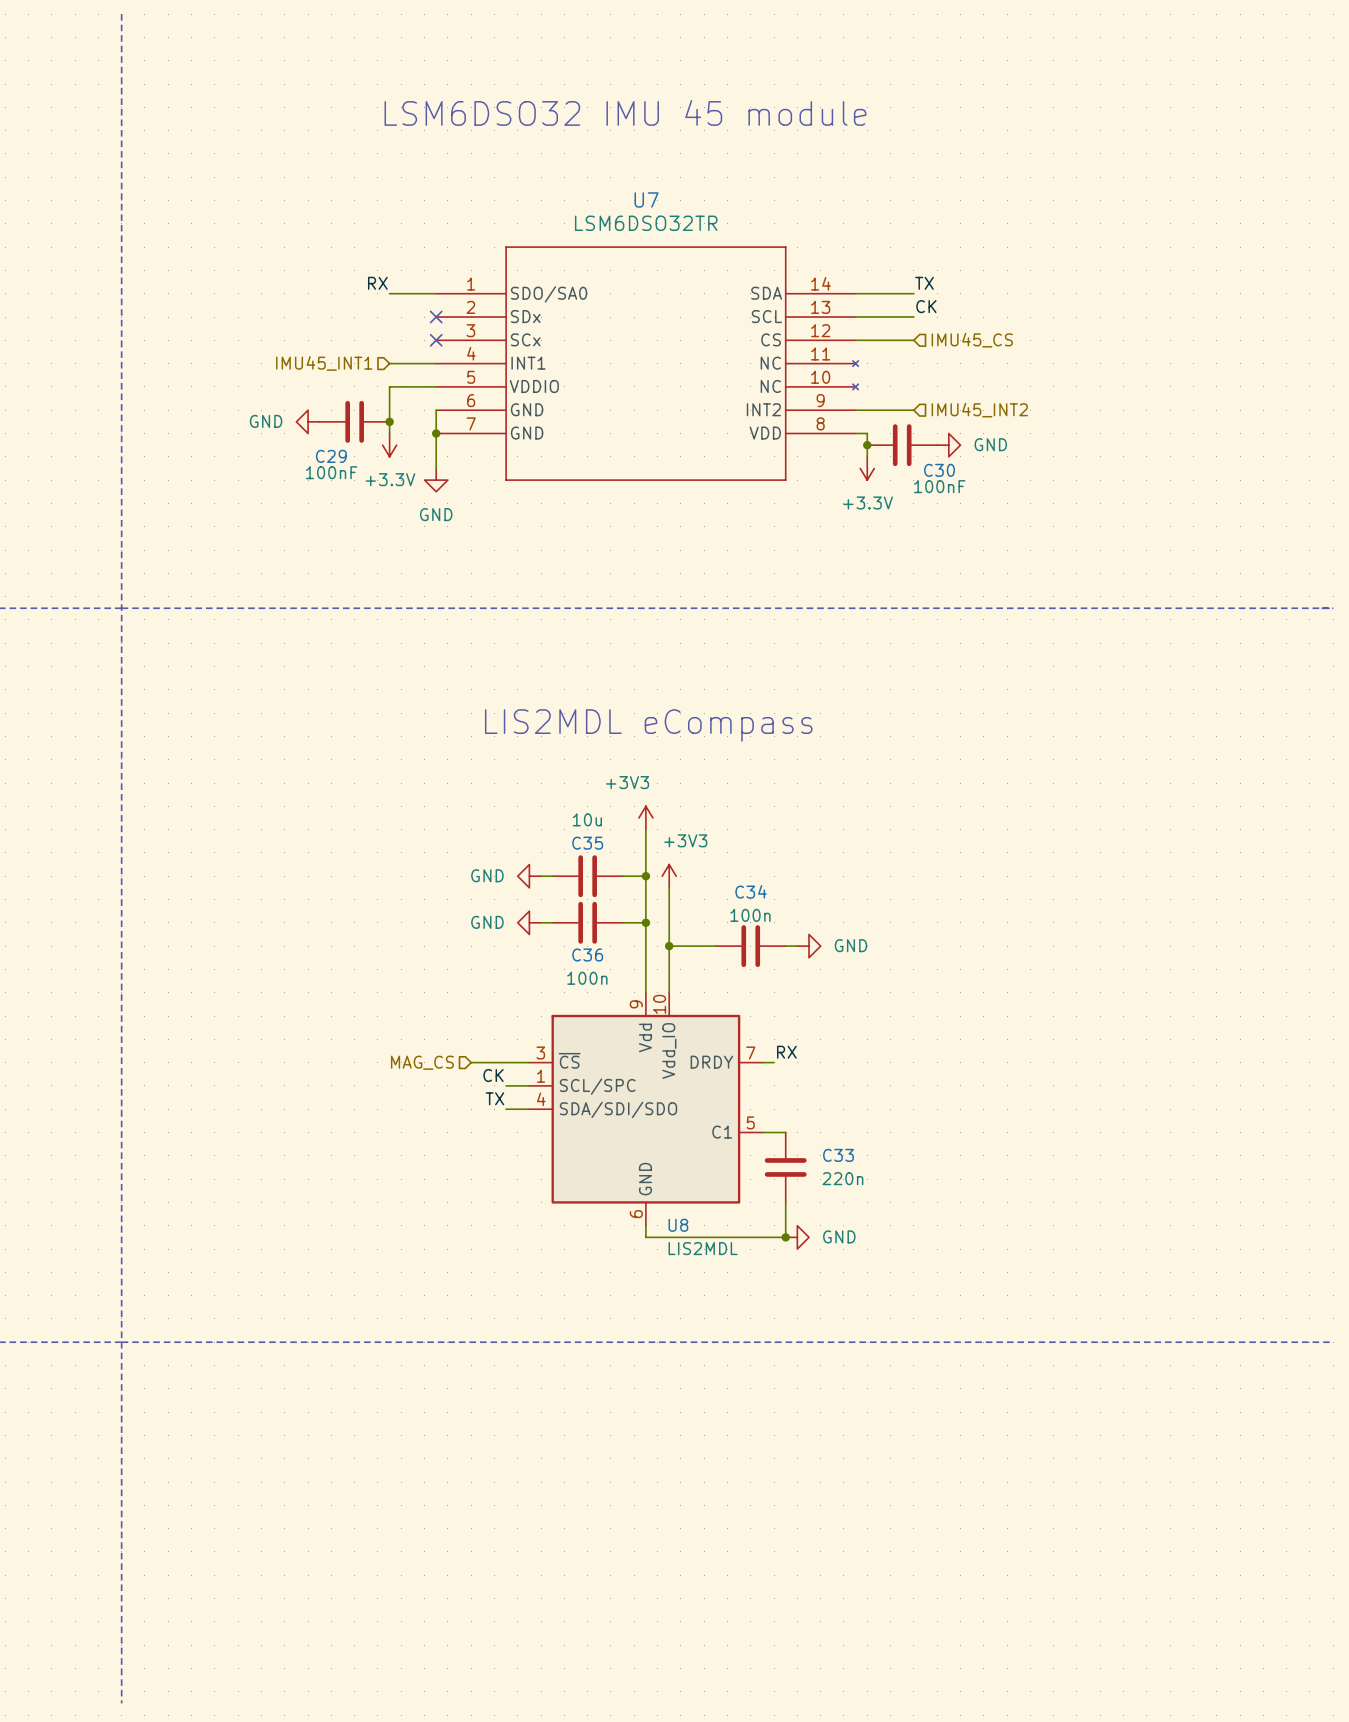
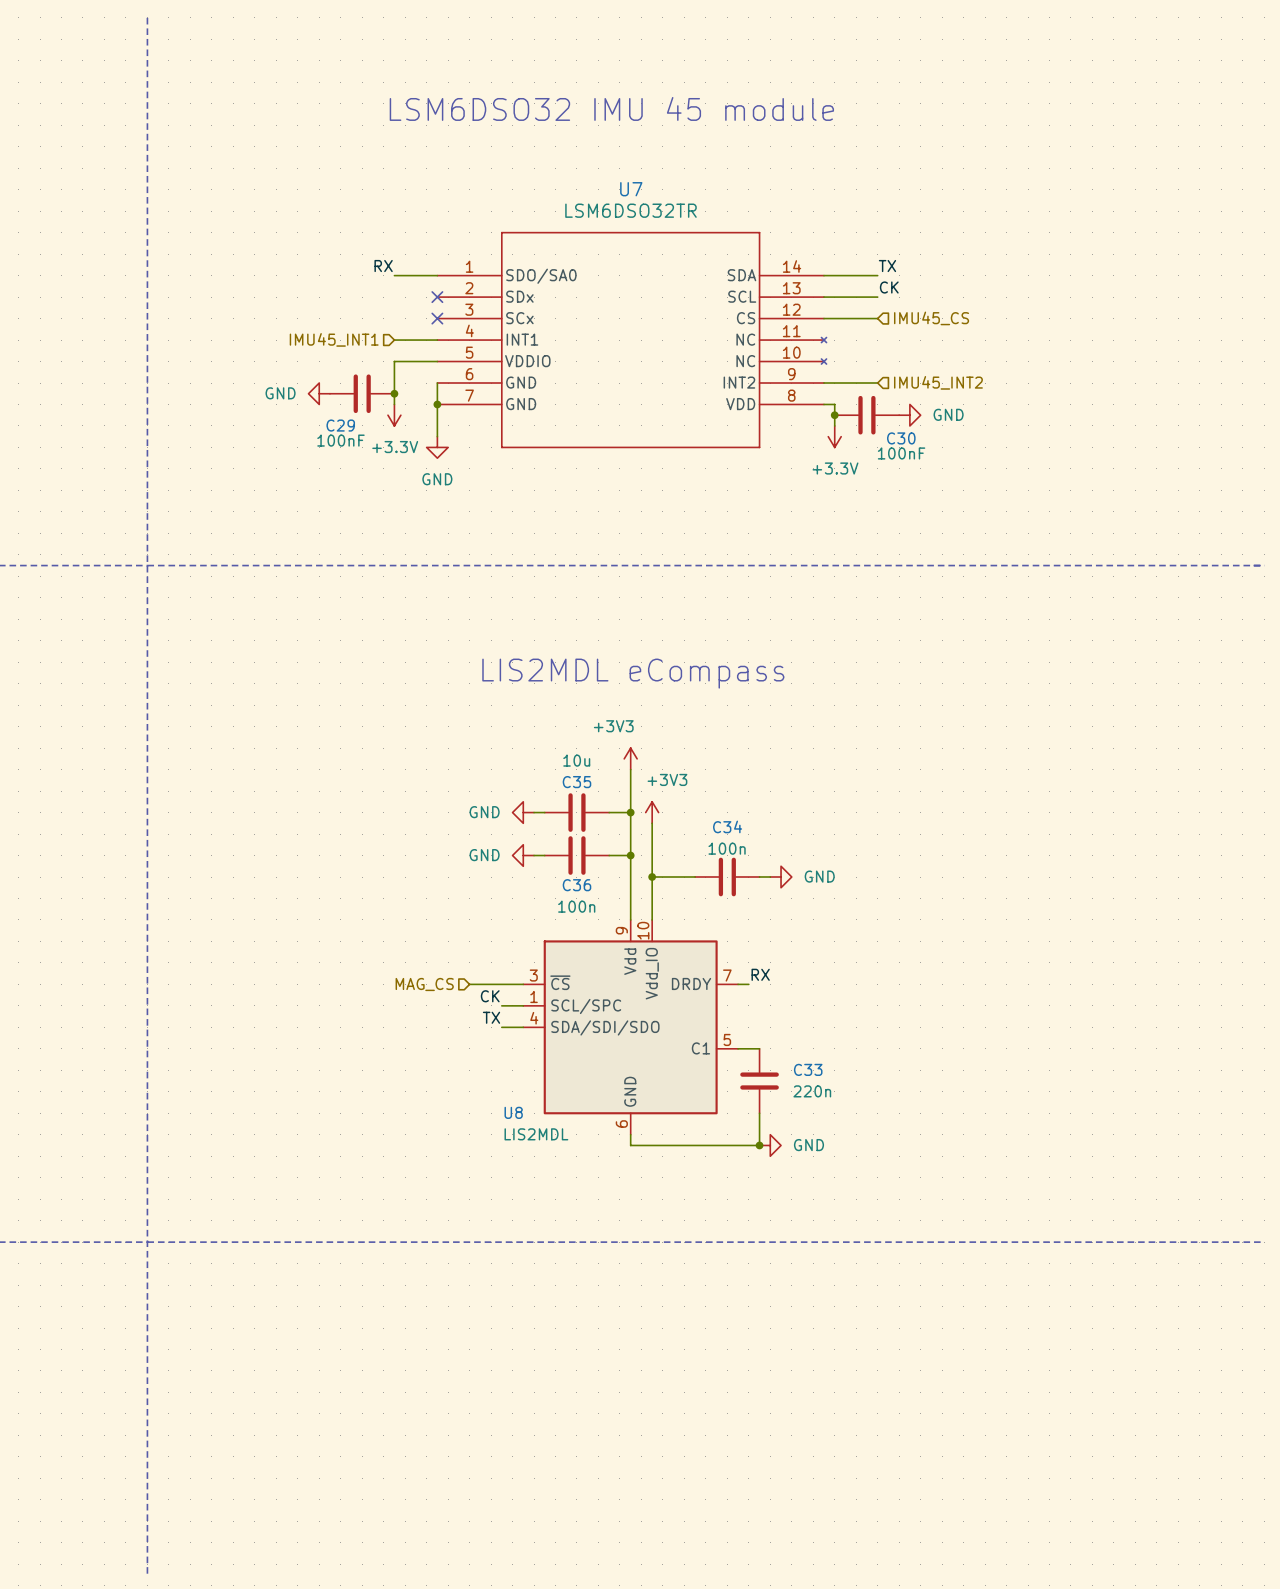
U8 name position: U8 (678, 1225) -> U8 (513, 1112)
U8 value position: LIS2MDL (703, 1248) -> LIS2MDL (536, 1134)

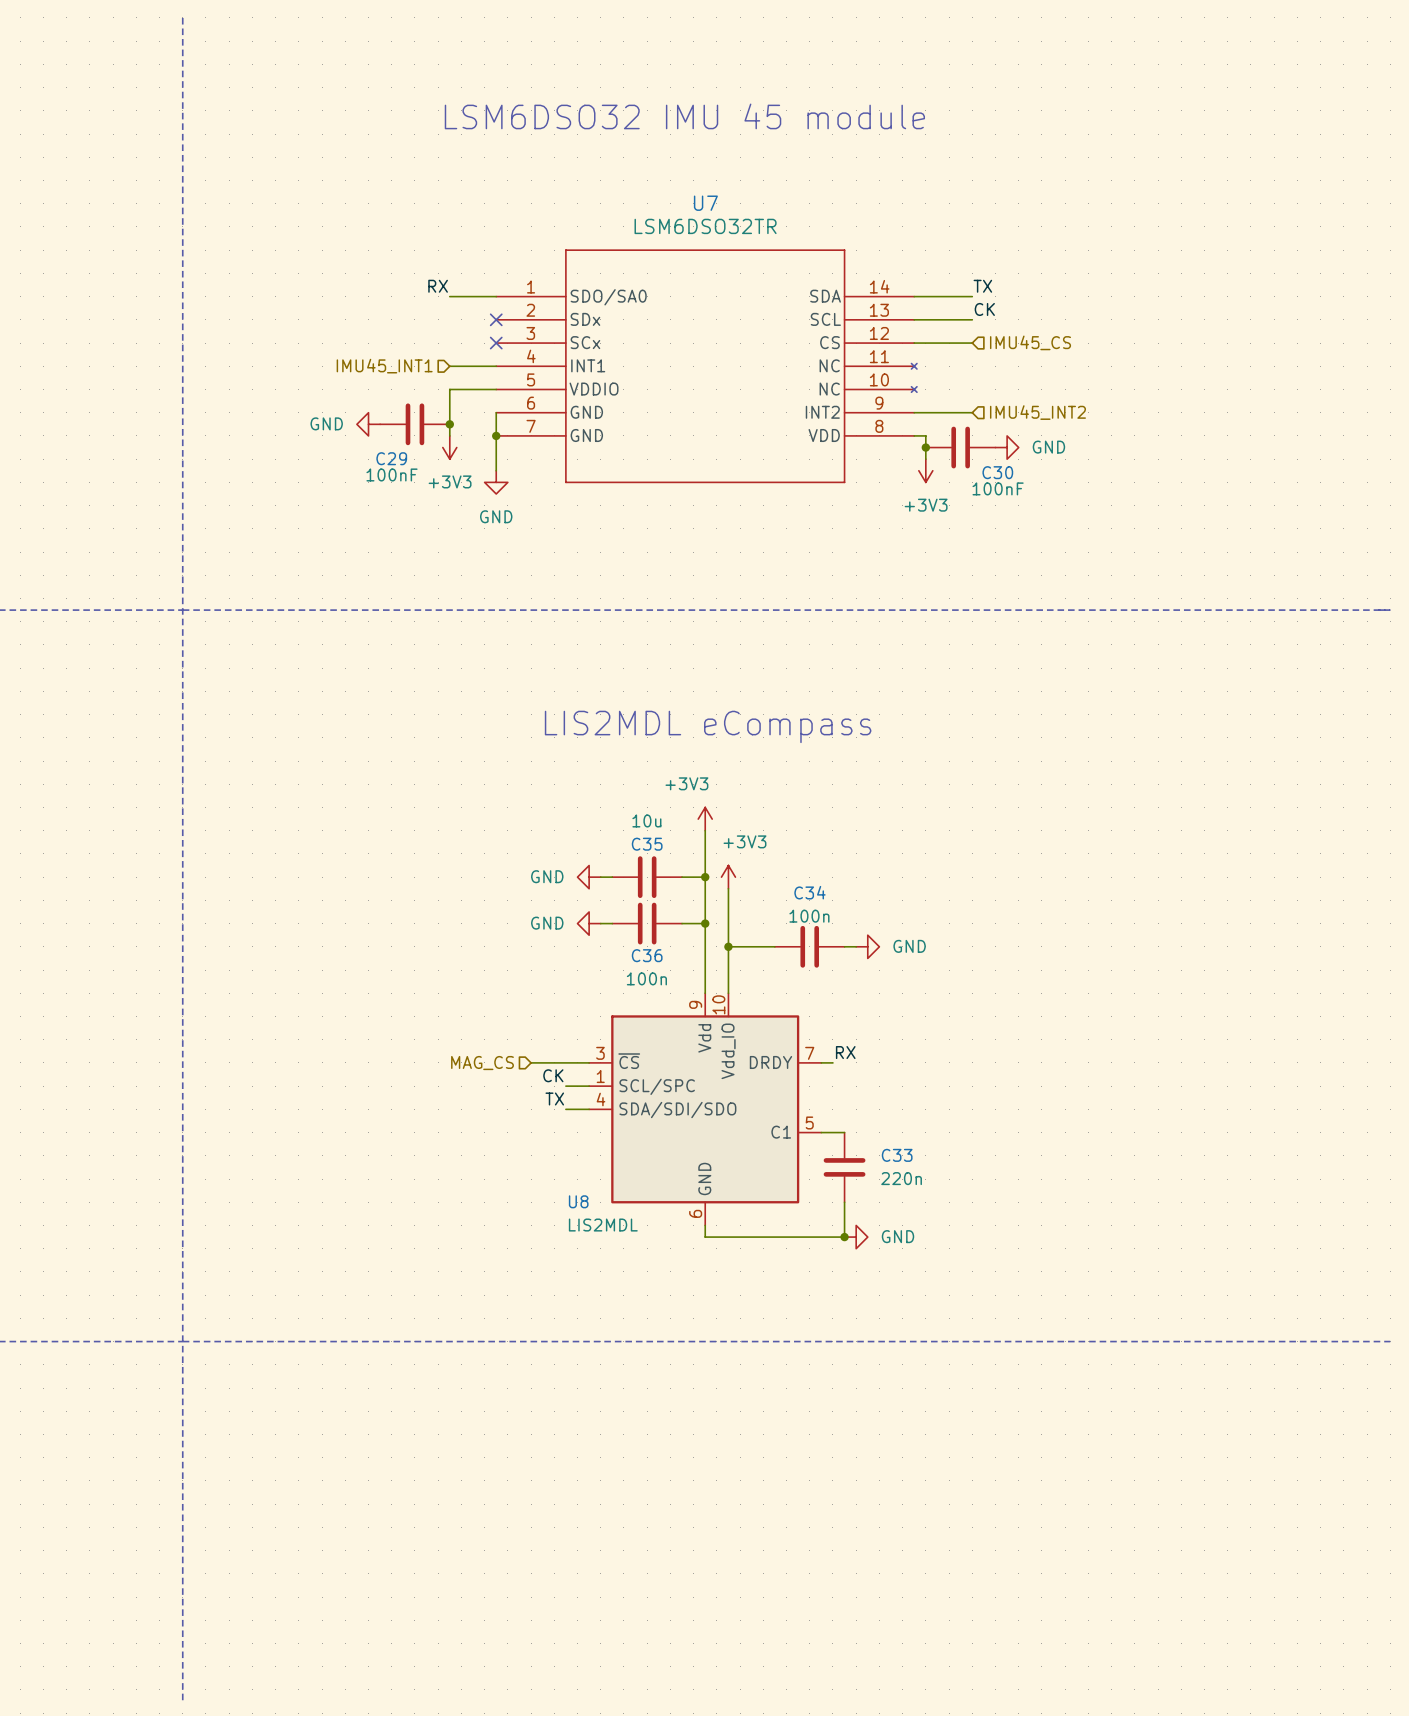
power symbol: +3.3V (394, 415) -> +3V3 (449, 447)
power symbol: +3.3V (834, 436) -> +3V3 (925, 470)

